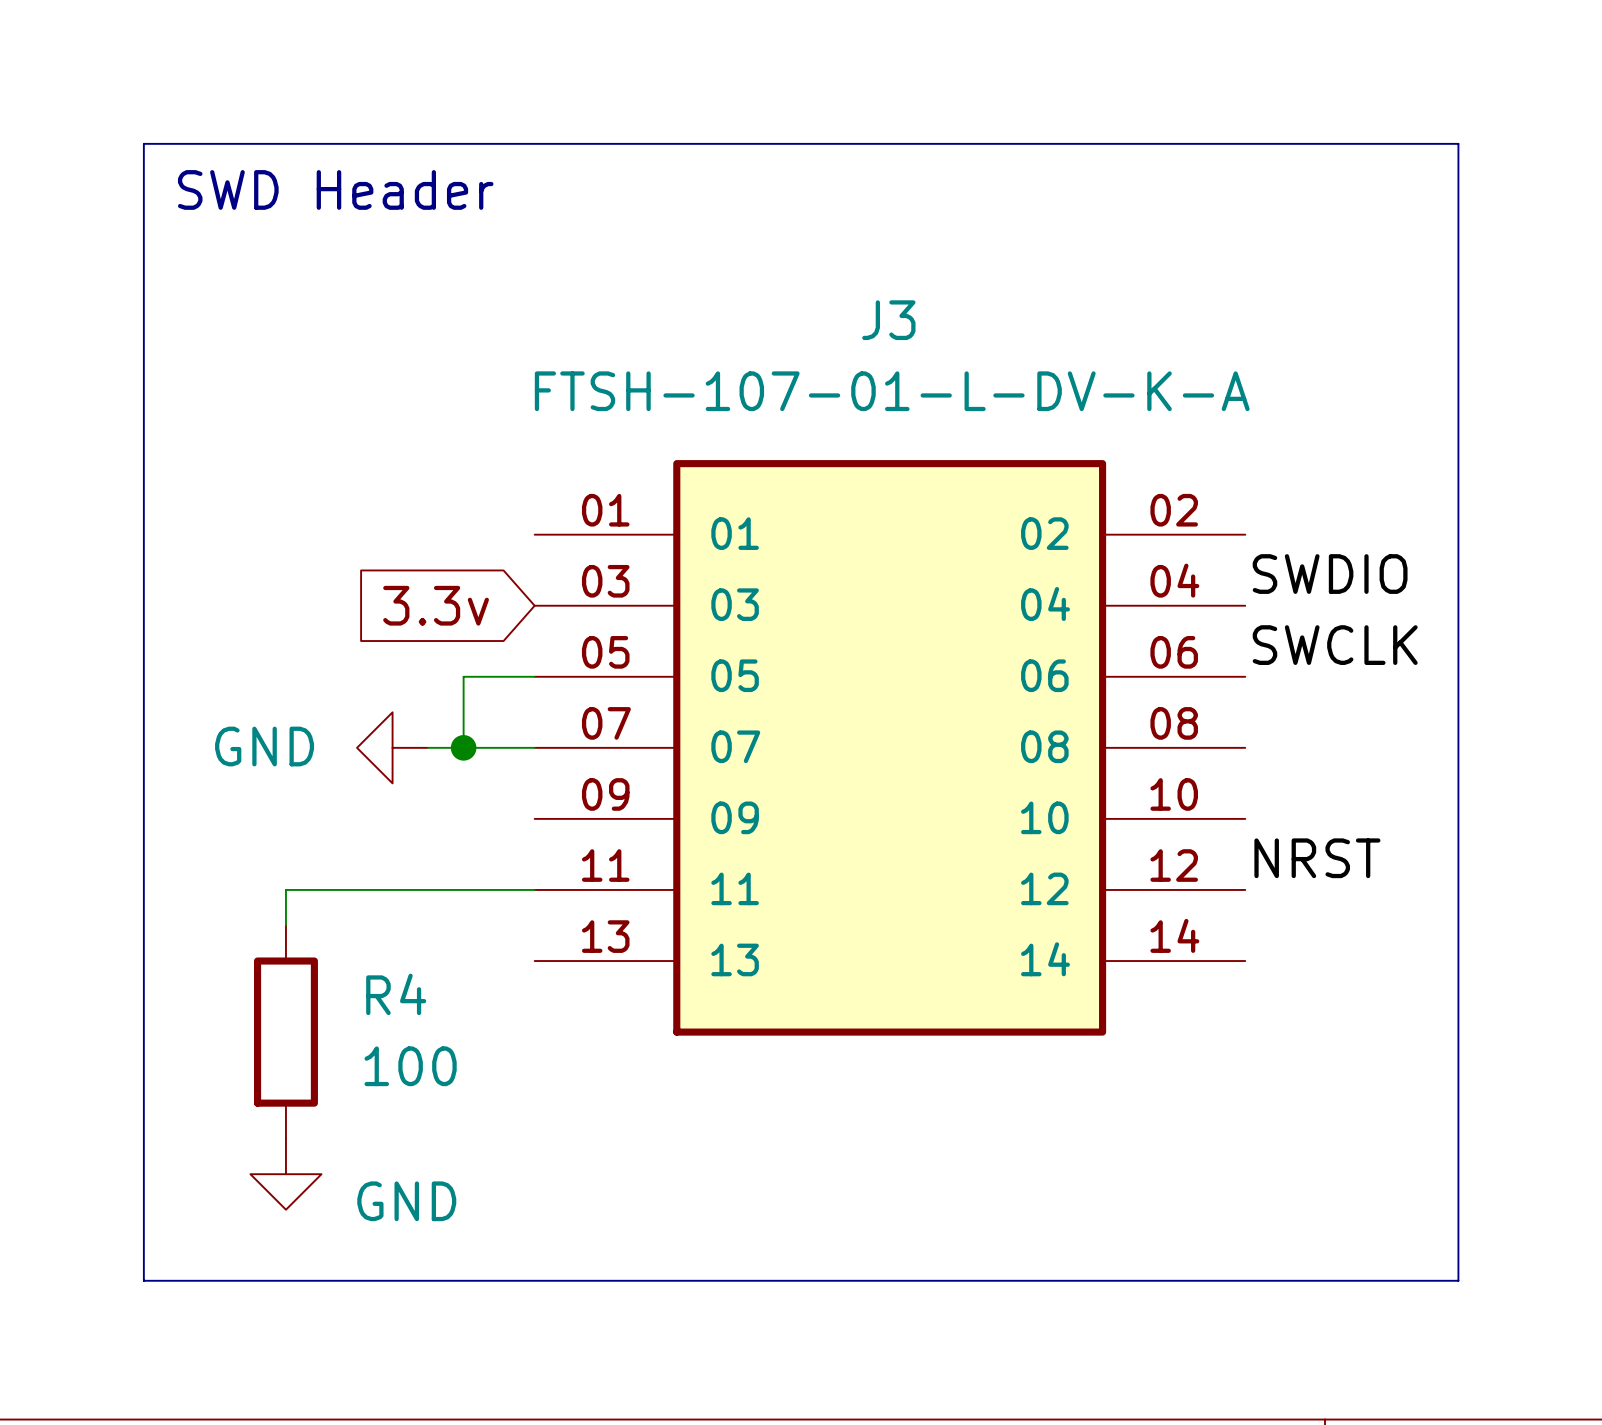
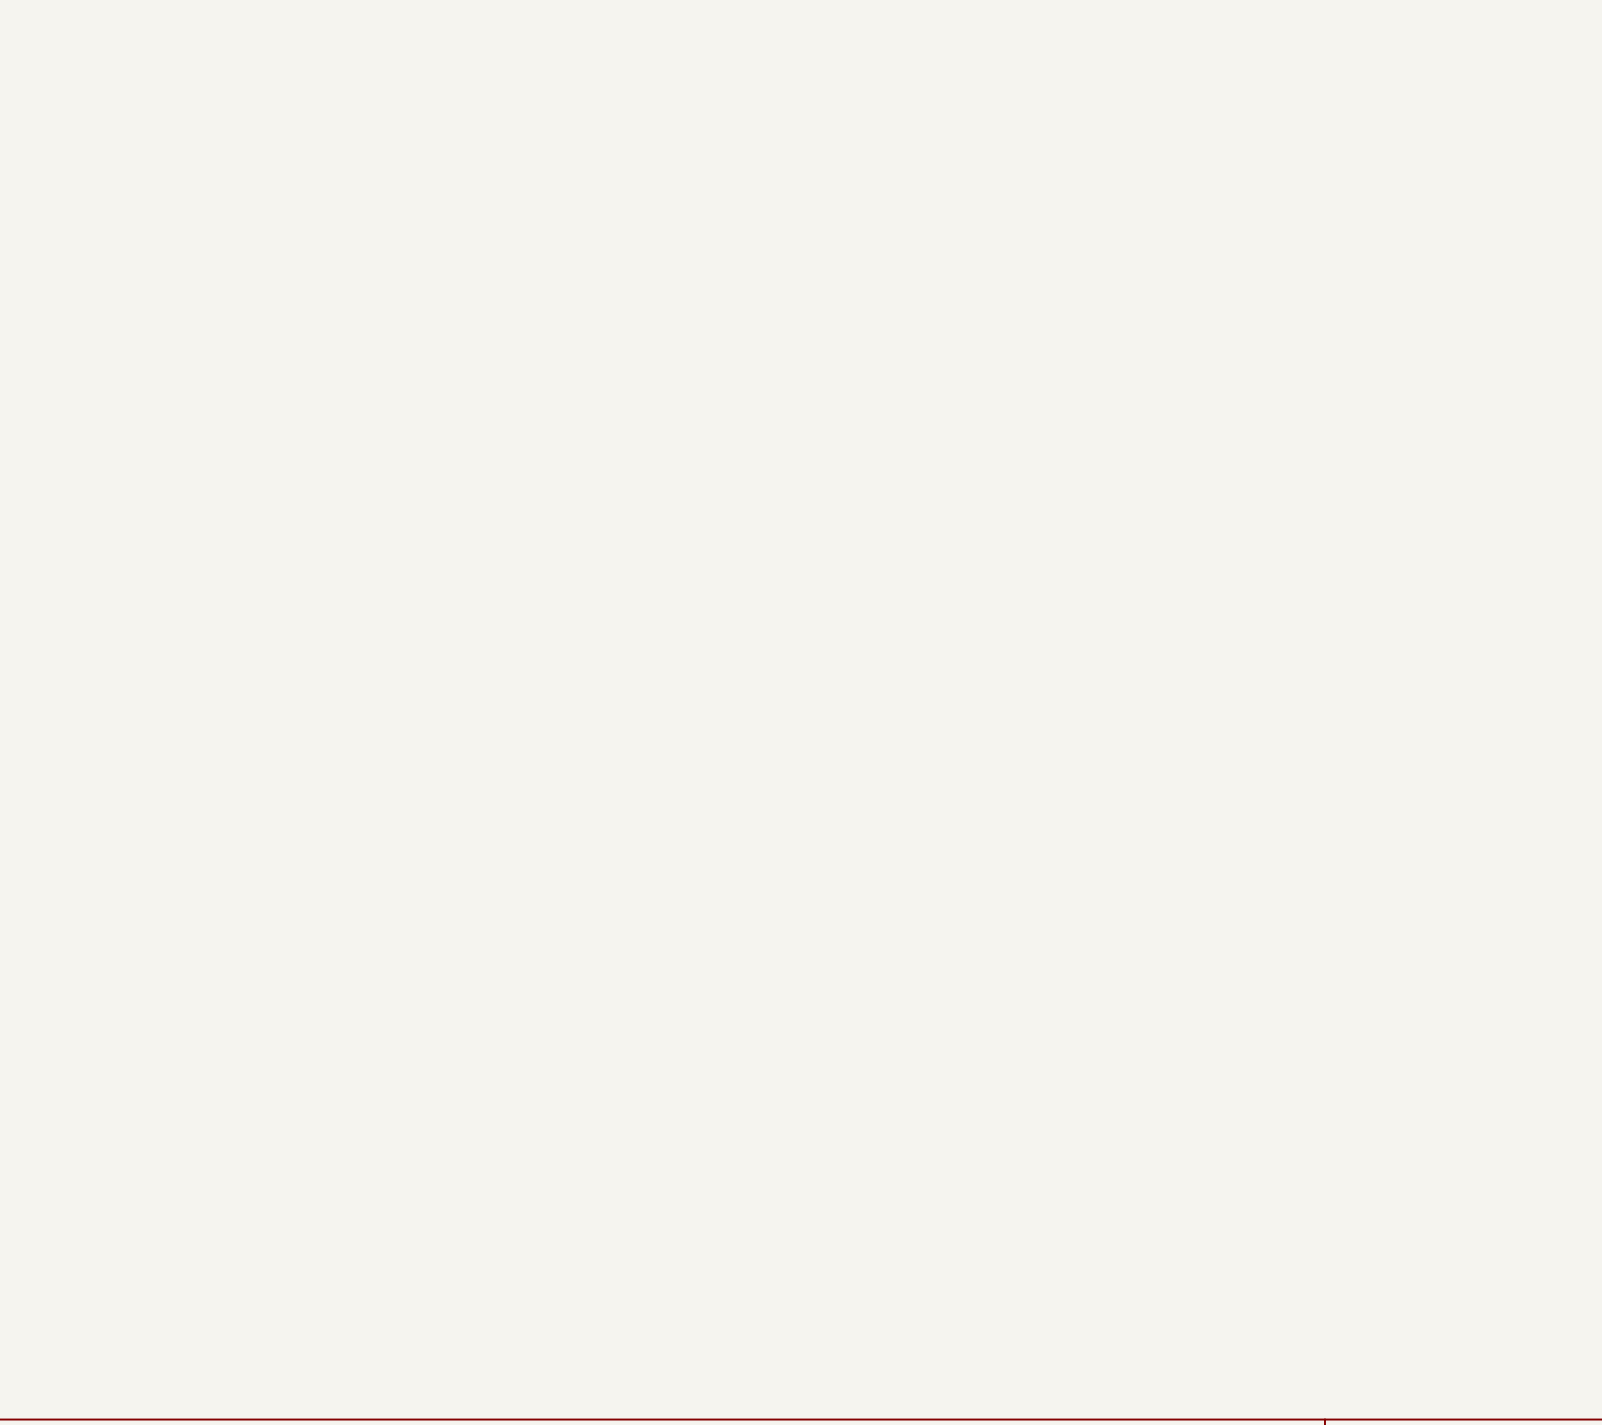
line: (143, 143) (1458, 143) (1458, 1280) (143, 1280) (143, 143) -> none
text: SWD Header (335, 189) -> none
label: SWDIO (1330, 574) -> none
global label: 3.3v (436, 605) -> none
label: SWCLK (1335, 645) -> none
wire: (534, 676) (463, 676) (463, 747) -> none
power symbol: GND (392, 747) -> none
wire: (428, 747) (534, 747) -> none
junction: (463, 747) -> none
J3: FTSH-107-01-L-DV-K-A (889, 747) -> none
label: NRST (1317, 858) -> none
wire: (534, 889) (285, 889) (285, 925) -> none
R4: 100 (285, 1032) -> none
power symbol: GND (285, 1174) -> none

